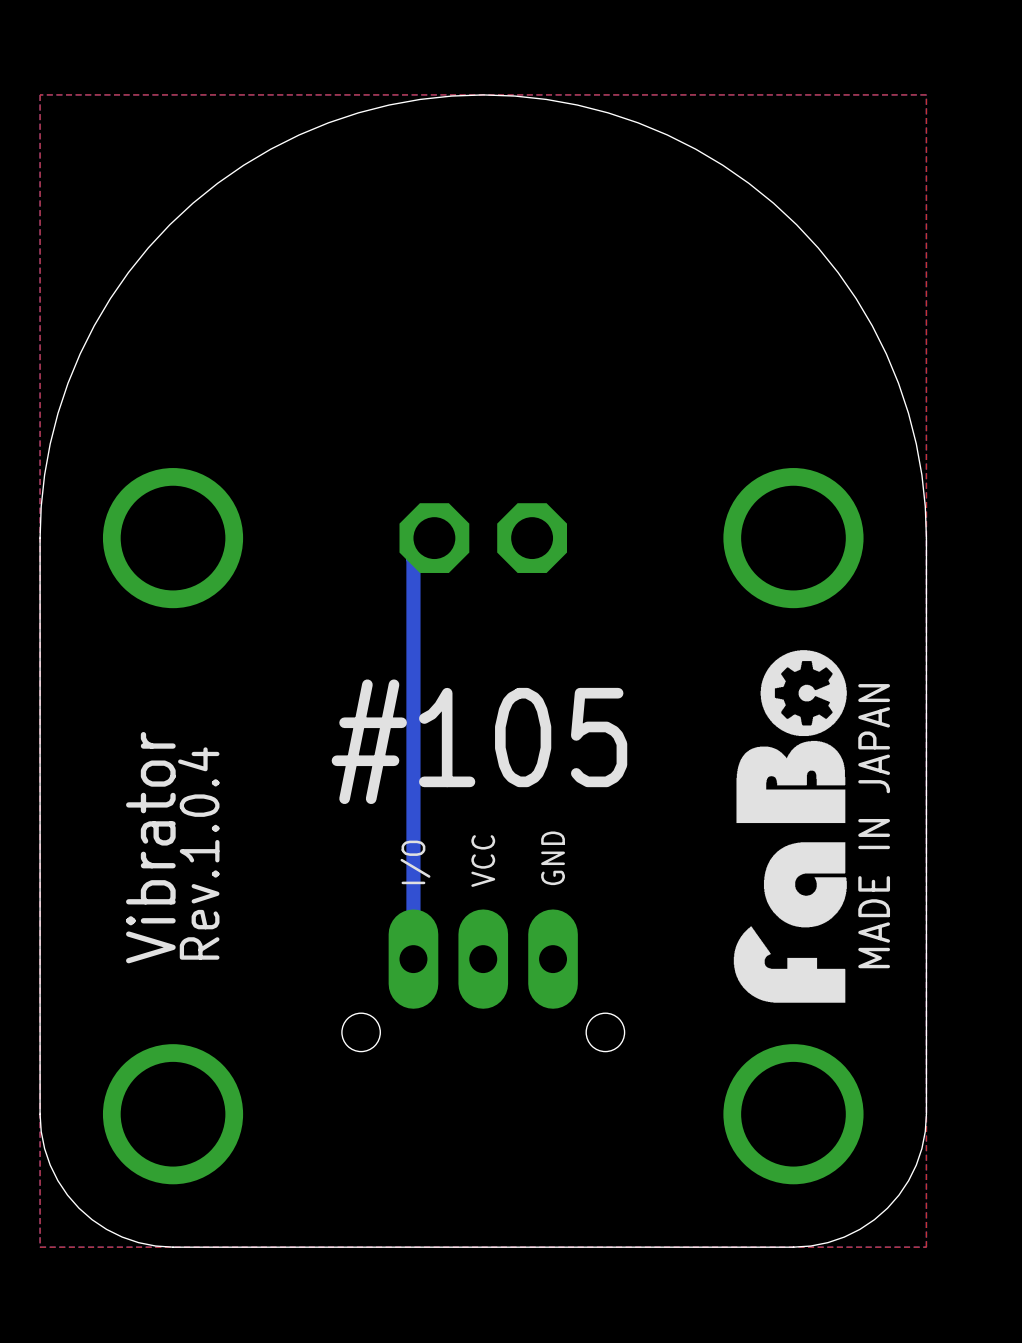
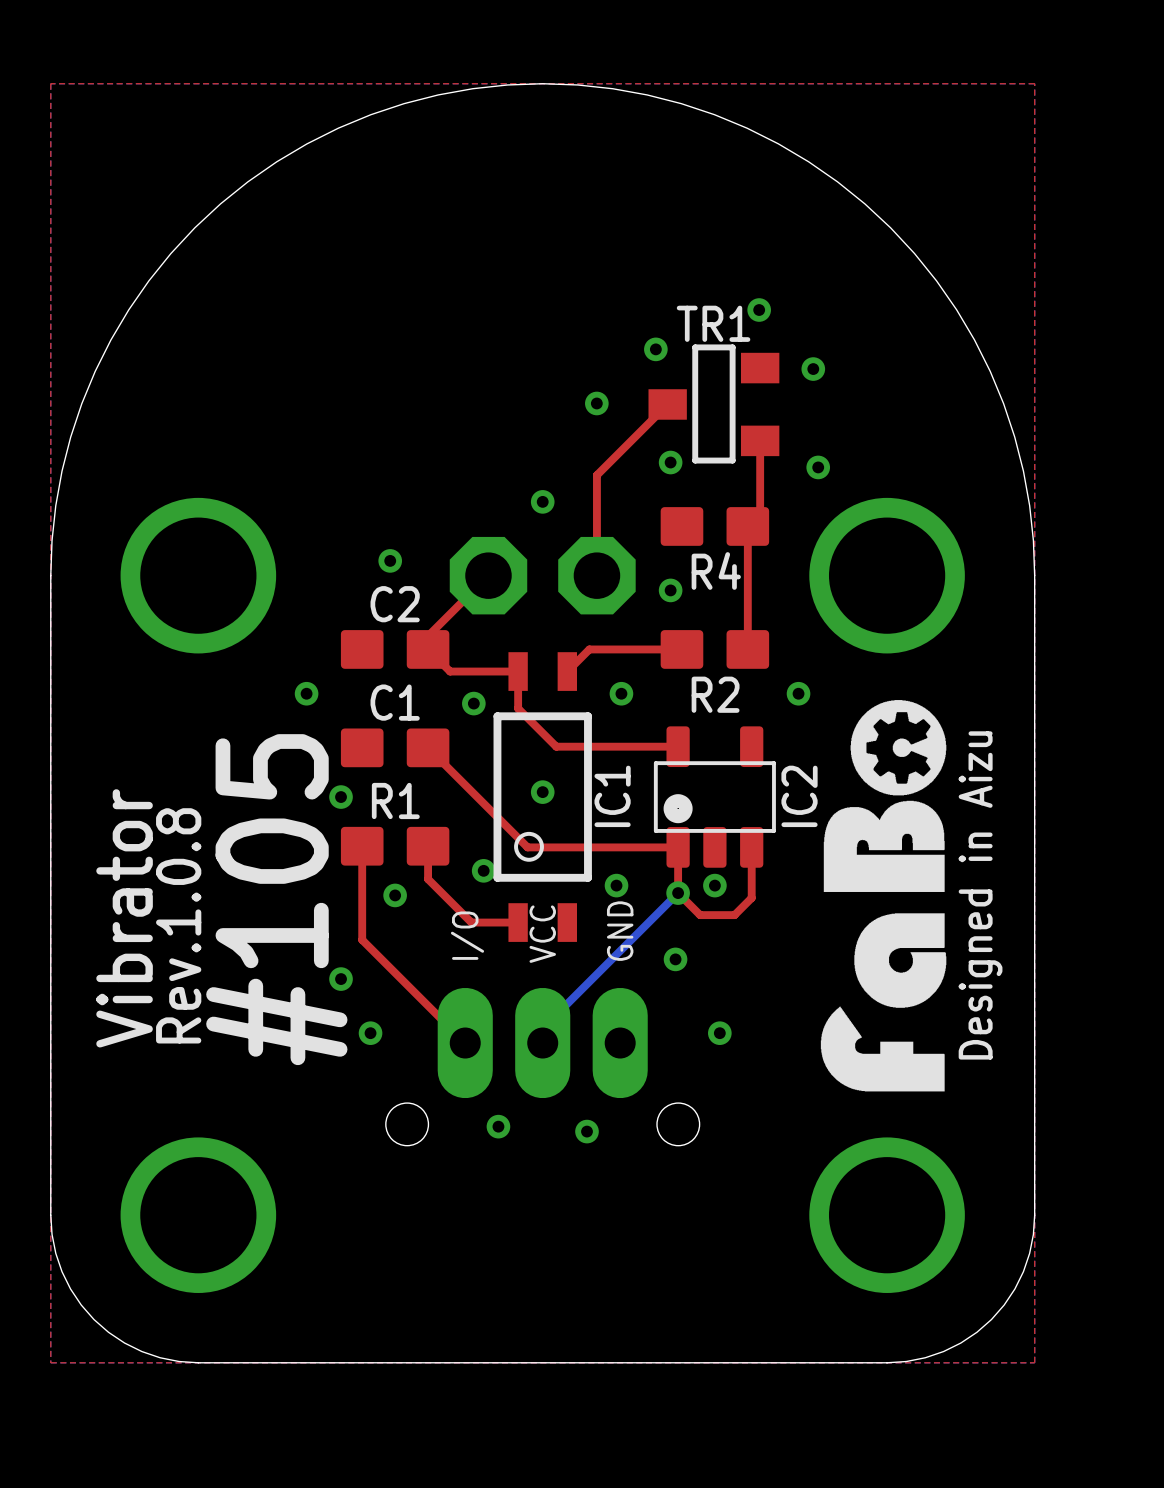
via: none -> (759, 310)
via: none -> (655, 349)
via: none -> (813, 369)
via: none -> (596, 403)
top track: none -> (667, 404) (596, 475) (596, 575)
TR1: none -> (713, 403)
top track: none -> (760, 440) (760, 514) (747, 526) (747, 649)
via: none -> (670, 462)
via: none -> (818, 467)
via: none -> (542, 501)
R4: none -> (714, 526)
via: none -> (390, 560)
bottom track: (434, 538) (413, 559) (413, 959) -> none
top track: none -> (488, 575) (428, 636) (428, 649) (450, 671) (518, 671) (518, 708) (556, 746) (678, 746)
via: none -> (670, 590)
C2: none -> (395, 649)
top track: none -> (681, 649) (589, 649) (567, 671)
R2: none -> (714, 649)
via: none -> (306, 693)
via: none -> (621, 693)
via: none -> (798, 693)
via: none -> (473, 703)
C1: none -> (395, 747)
top track: none -> (428, 747) (527, 847) (678, 847) (678, 893) (700, 915) (734, 915) (751, 897) (751, 847)
via: none -> (542, 792)
via: none -> (341, 797)
IC1: none -> (542, 797)
IC2: none -> (714, 797)
text rotation: 0° (479, 741) -> 90° counterclockwise (276, 899)
top track: none -> (362, 846) (362, 939) (465, 1043)
R1: none -> (395, 846)
top track: none -> (428, 846) (428, 879) (471, 922) (518, 922)
via: none -> (483, 870)
via: none -> (616, 885)
via: none -> (714, 885)
bottom track: none -> (678, 893) (542, 1028) (542, 1043)
via: none -> (678, 893)
via: none -> (395, 895)
text: MADE IN JAPAN (874, 826) -> Designed in Aizu (980, 895)
text: none -> Vibrator (124, 918)
text: Vibrator (150, 847) -> Rev.1.0.8 (178, 925)
text: Rev.1.0.4 (198, 853) -> none
via: none -> (675, 959)
via: none -> (341, 979)
via: none -> (370, 1033)
via: none -> (719, 1033)
via: none -> (498, 1126)
via: none -> (586, 1131)

